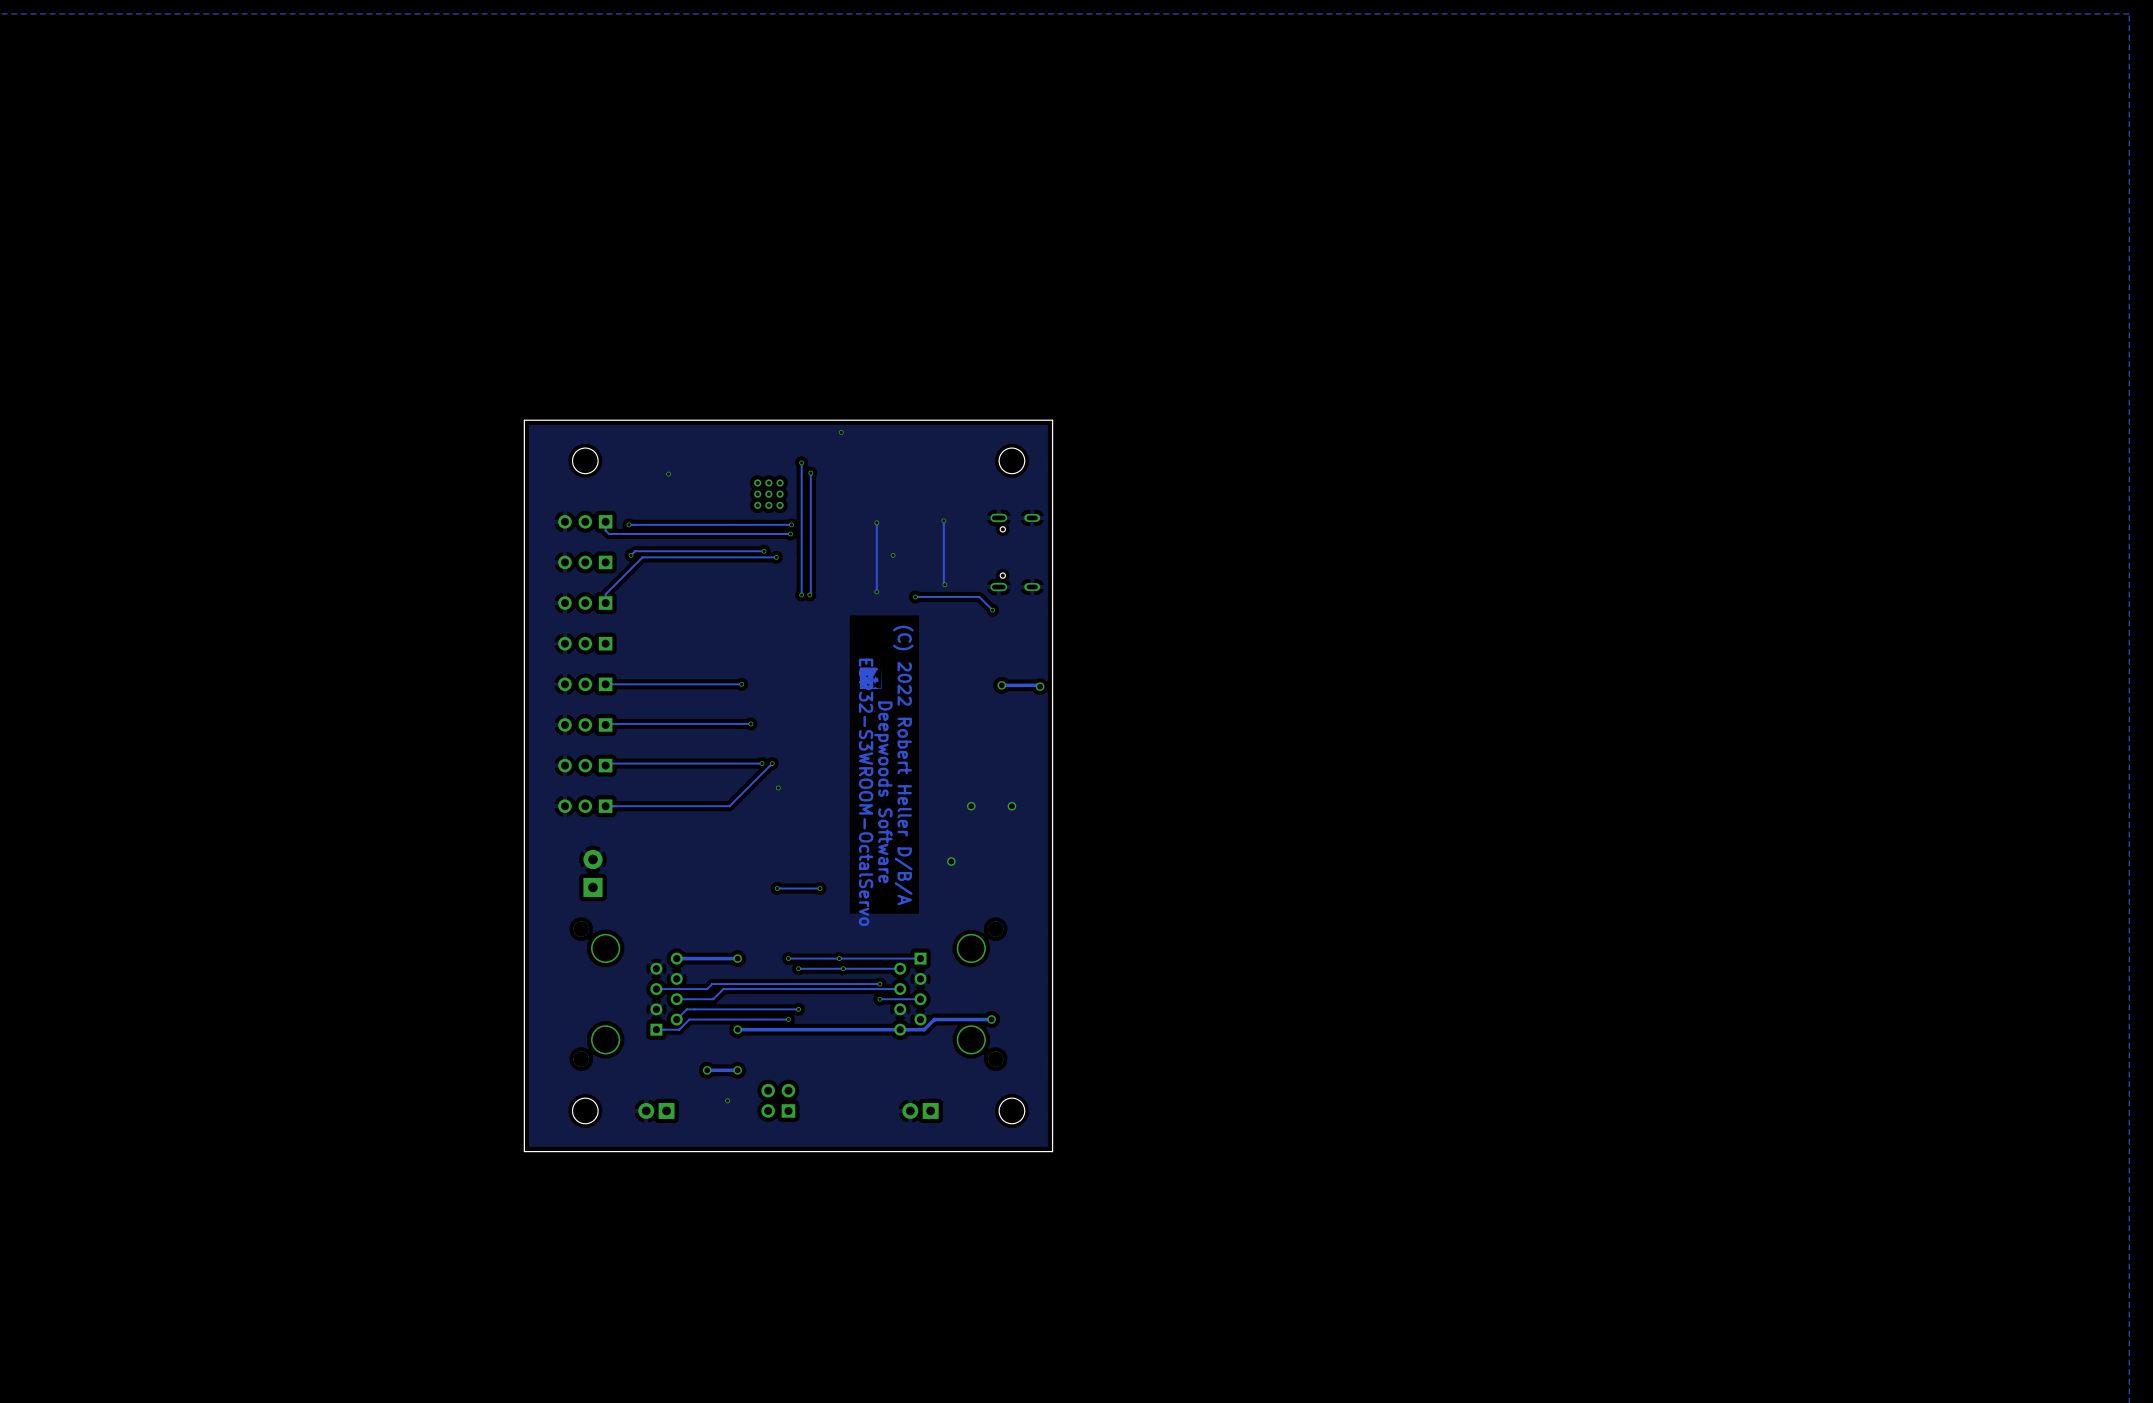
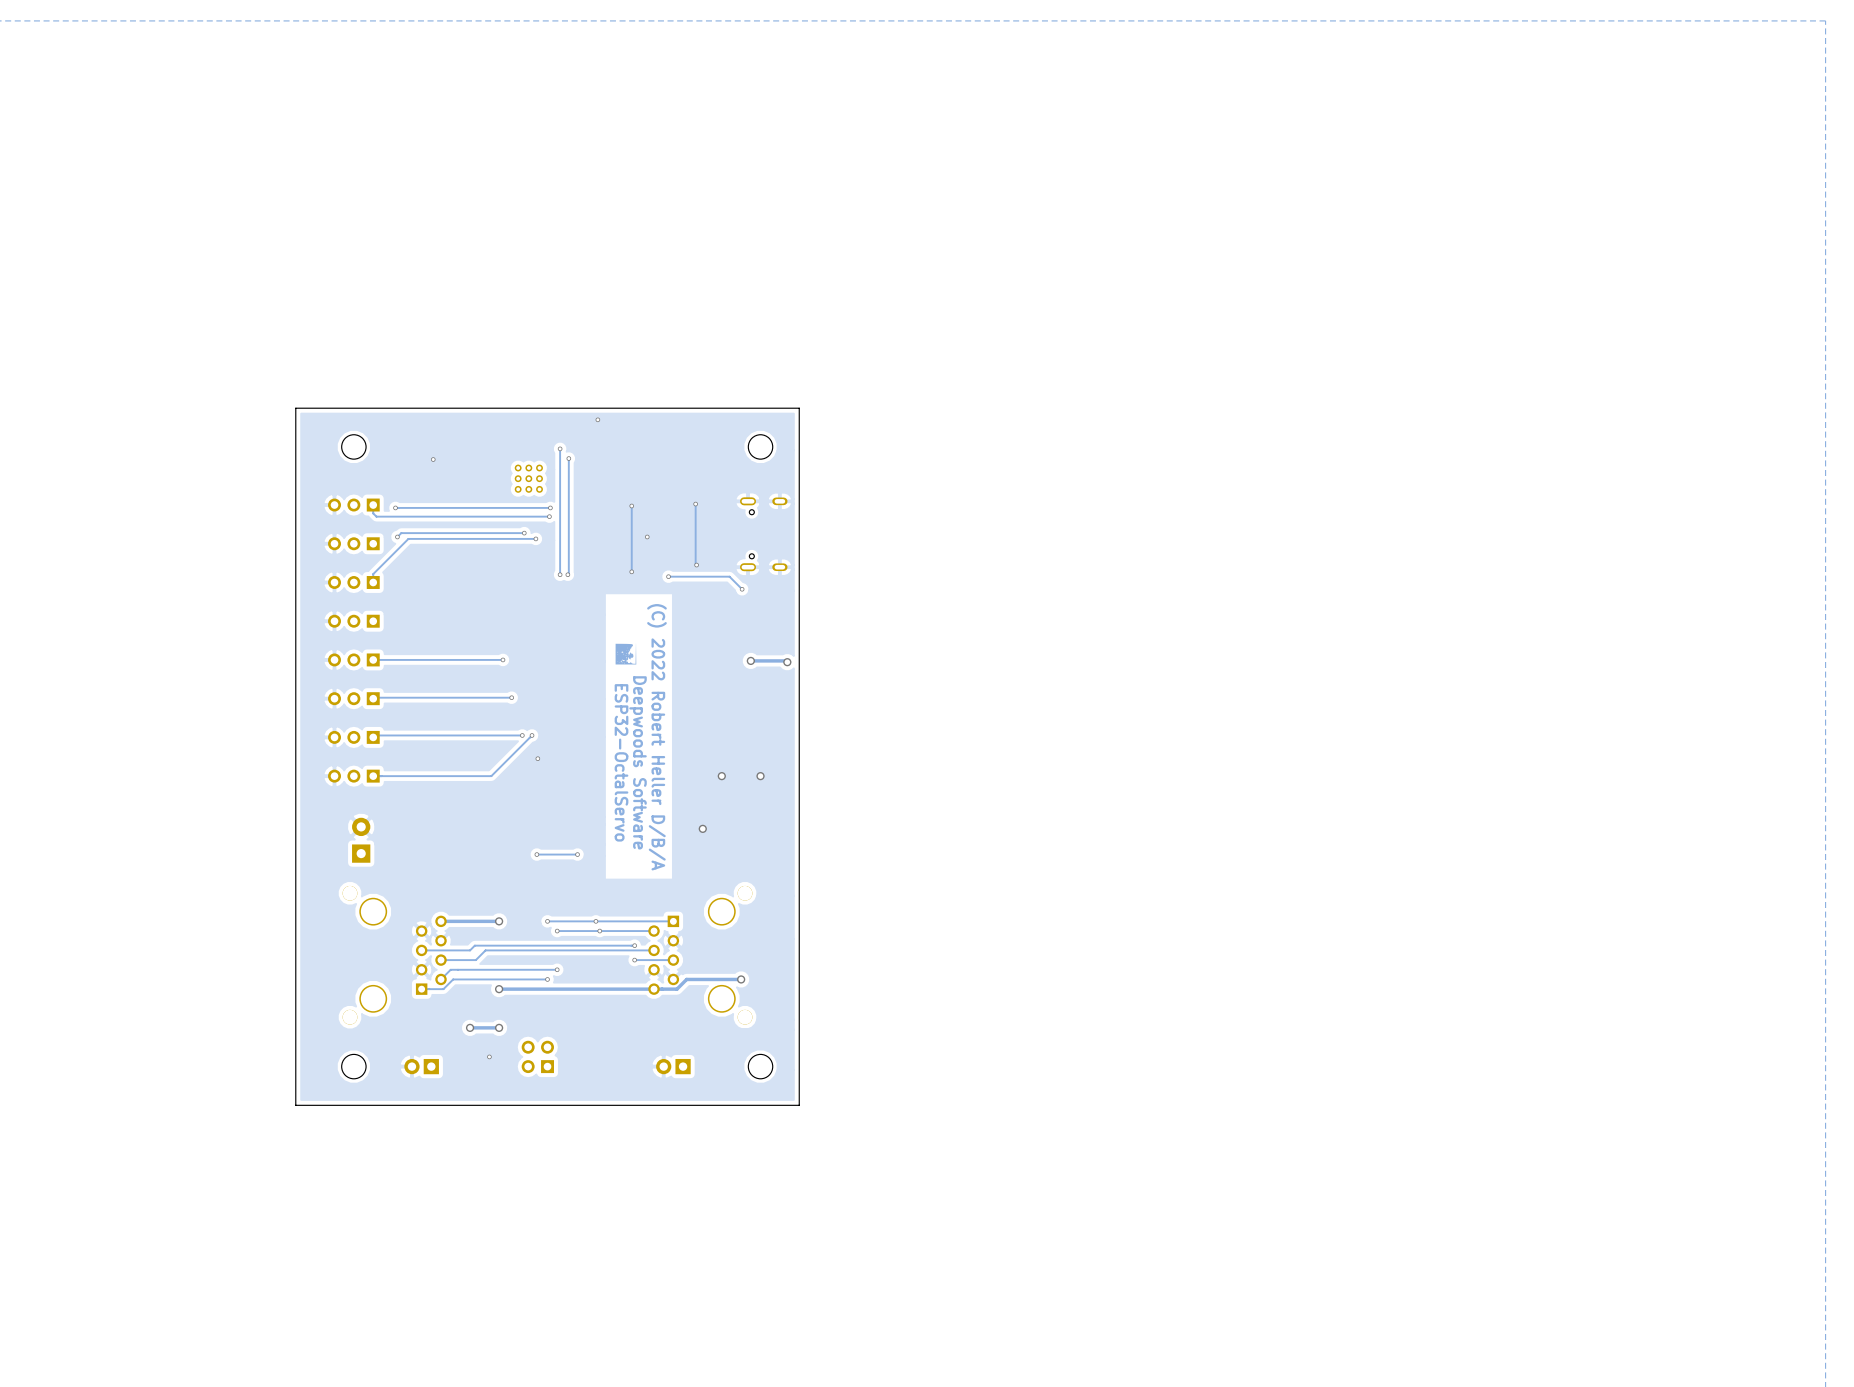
text: ESP32-S3WROOM-OctalServo (866, 792) -> ESP32-OctalServo (621, 762)

